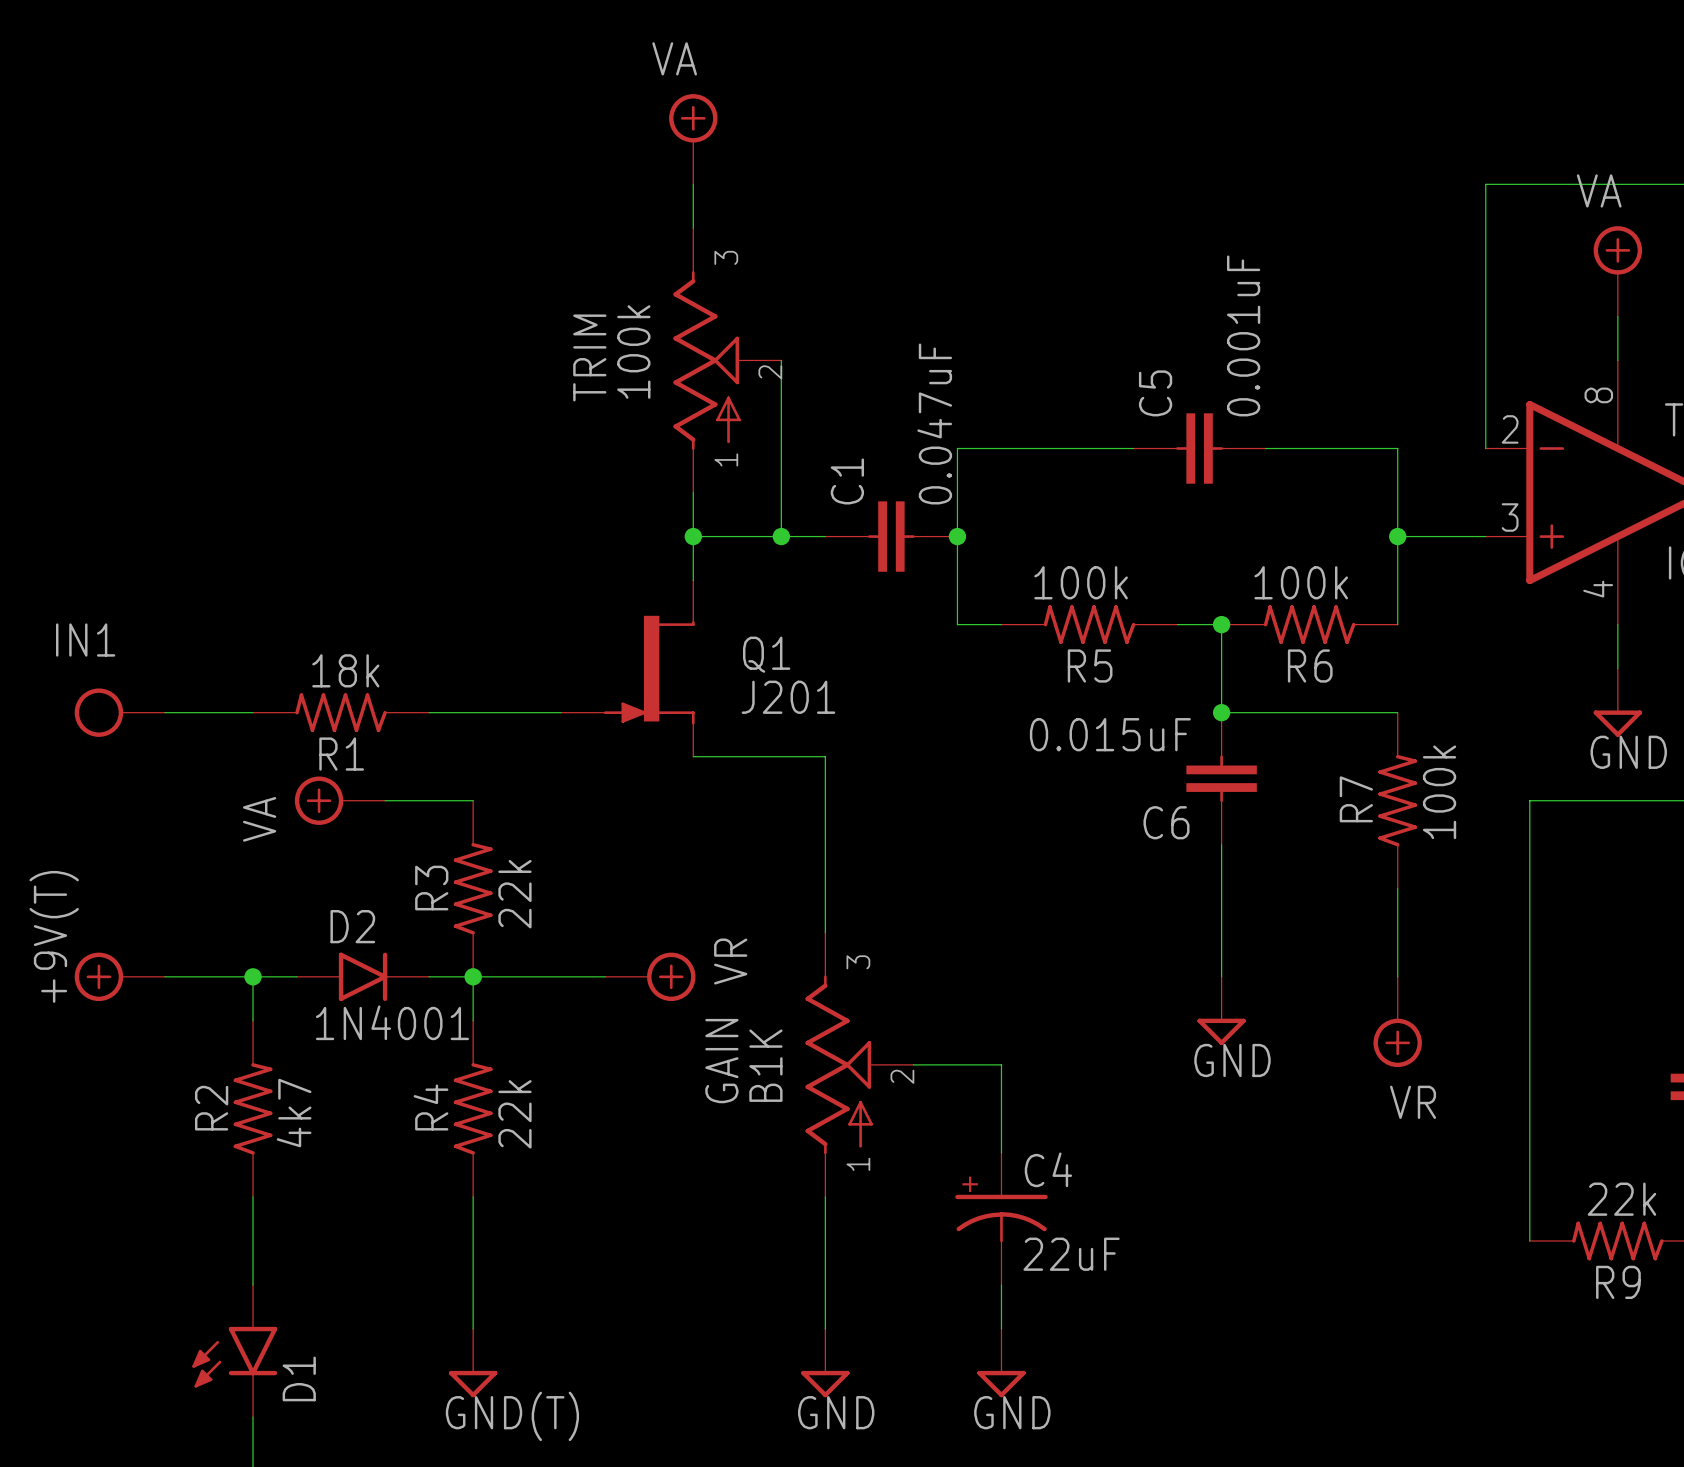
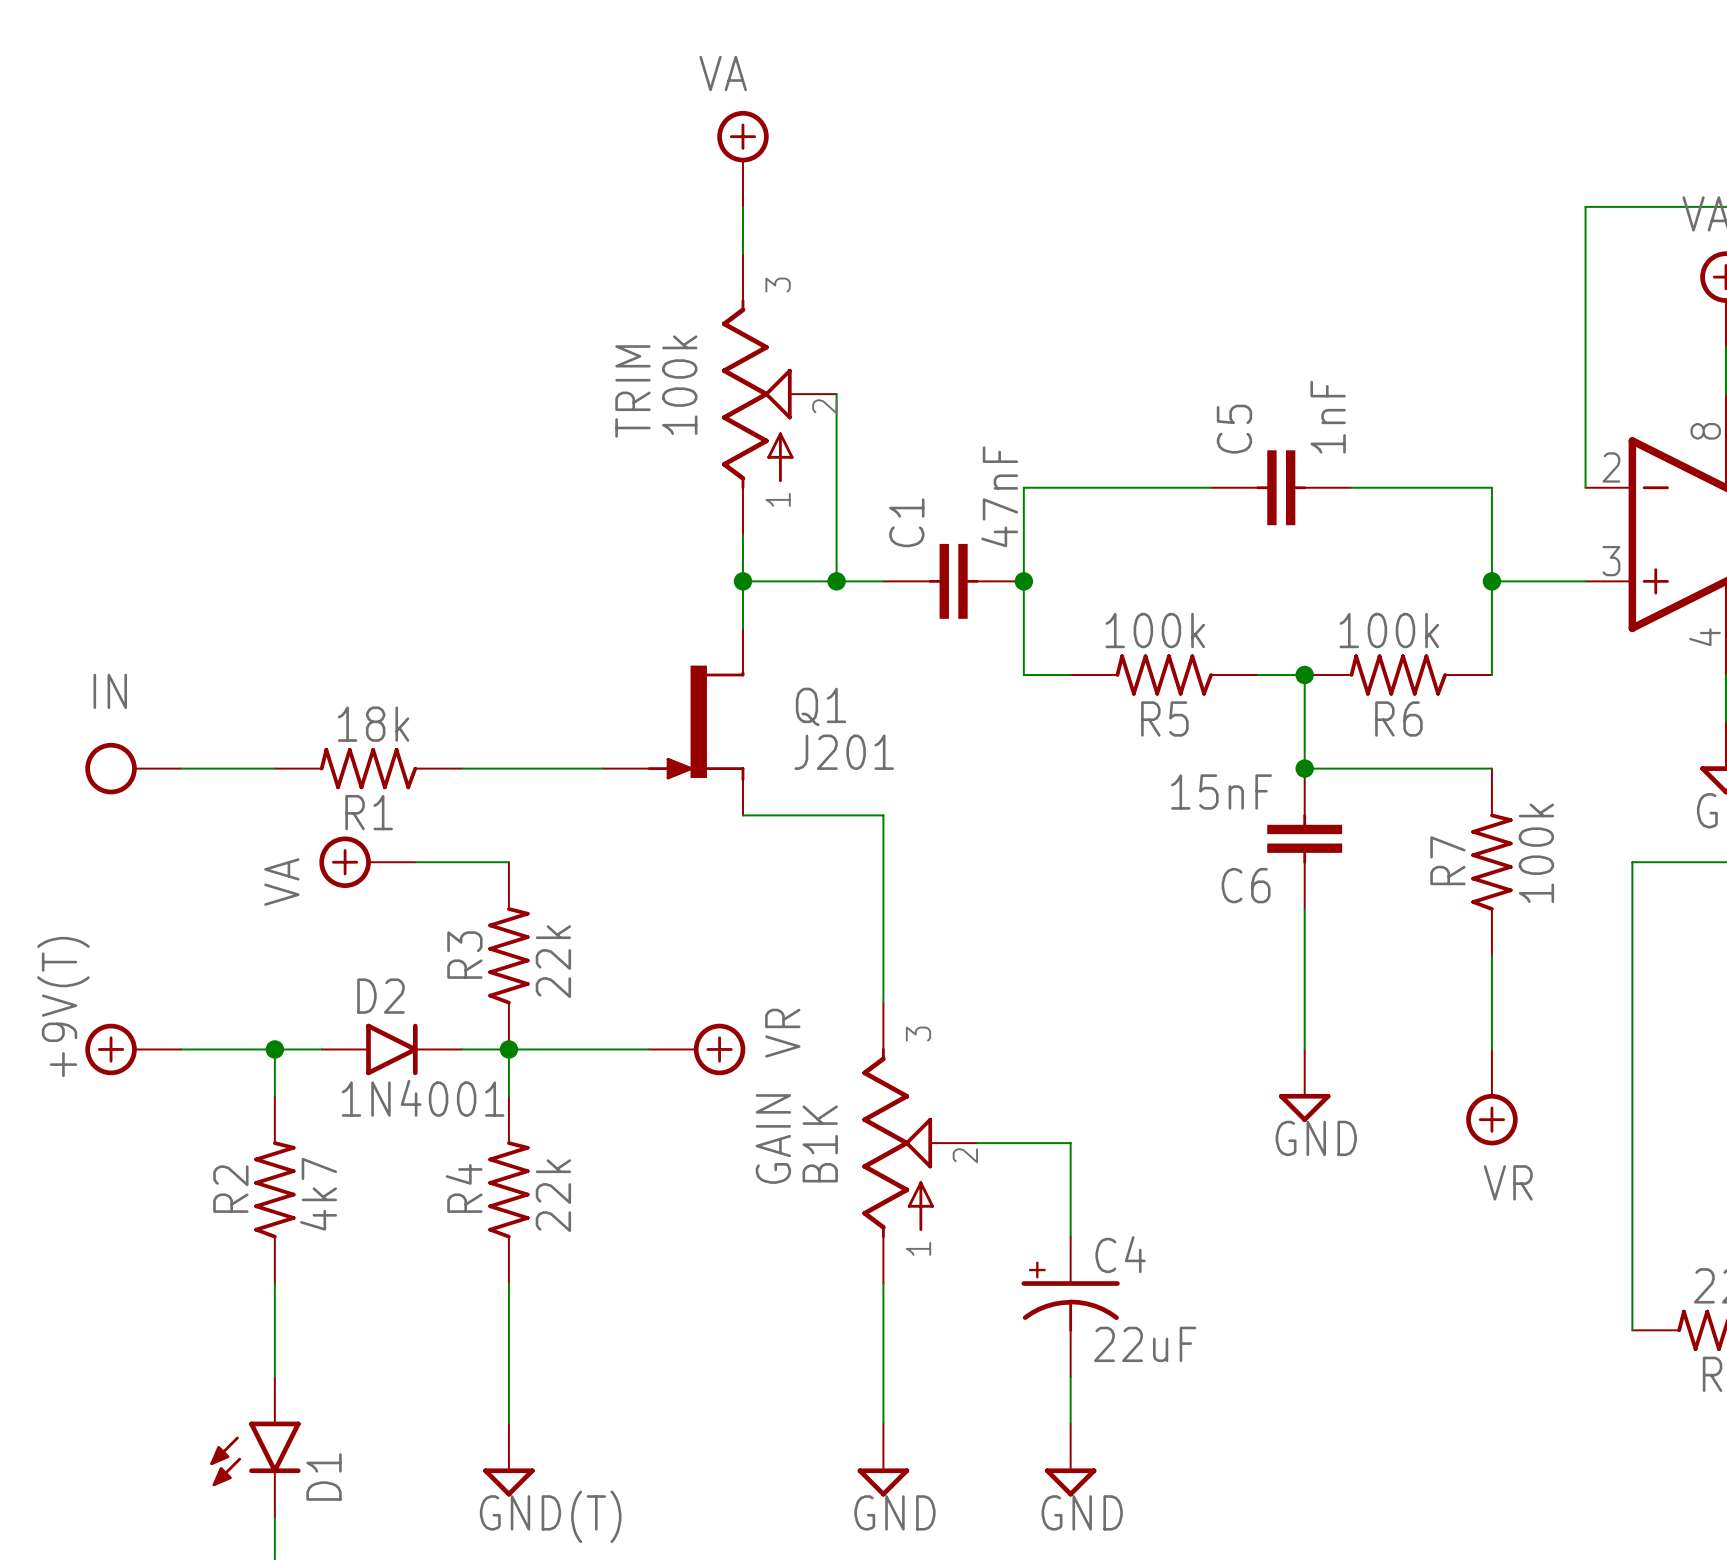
C5 value: 0.001uF (1243, 335) -> 1nF (1328, 417)
C1 value: 0.047uF (934, 423) -> 47nF (999, 496)
IN1 name: IN1 (85, 640) -> IN (110, 691)
C6 value: 0.015uF (1110, 734) -> 15nF (1221, 792)

